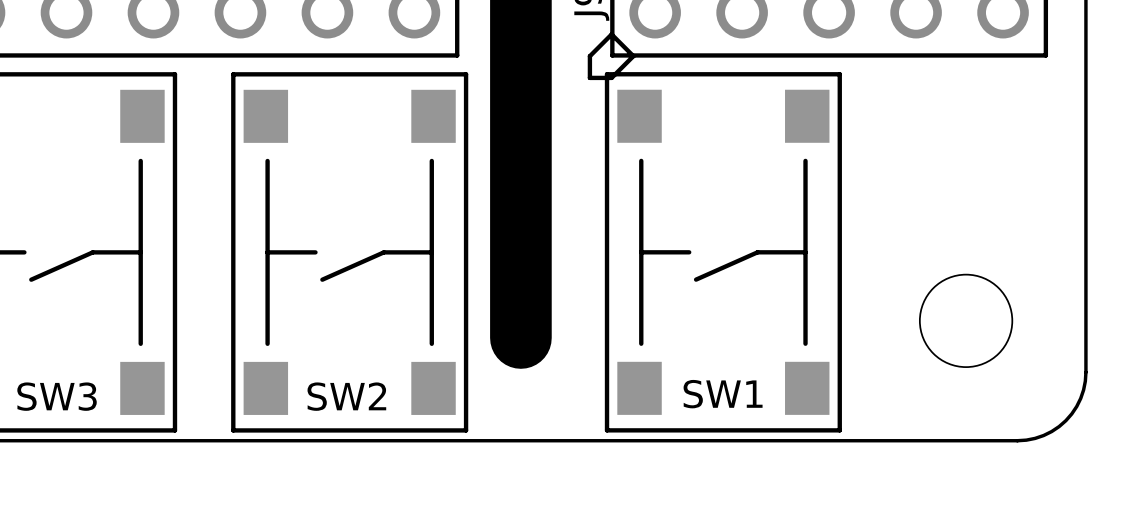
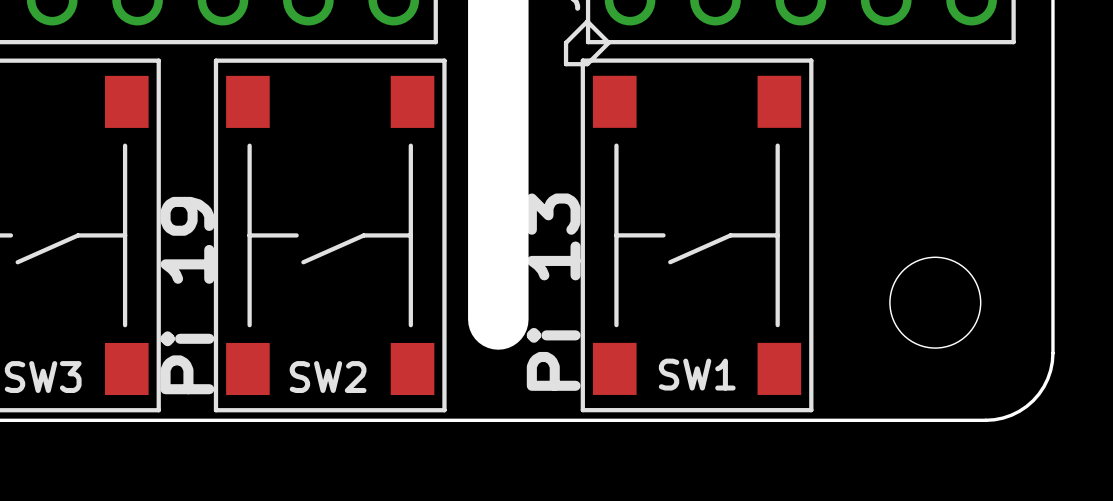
text: none -> Pi 13 (553, 292)
text: none -> Pi 19 (187, 295)

